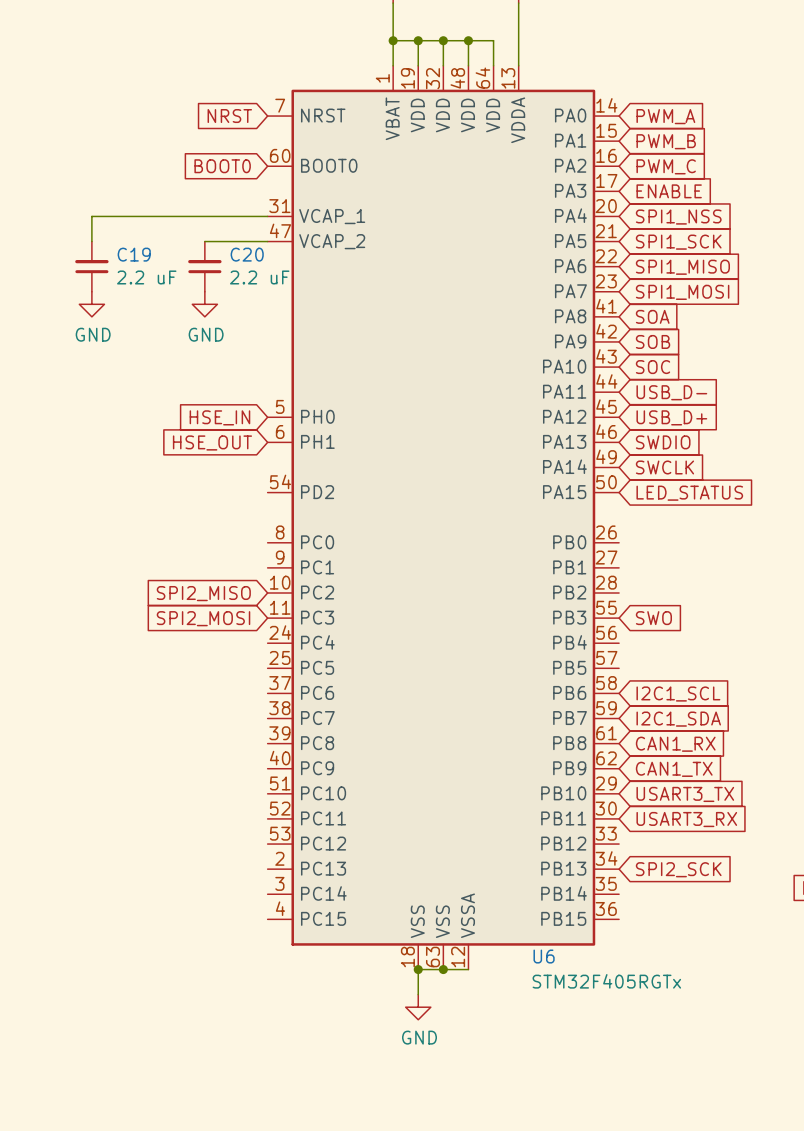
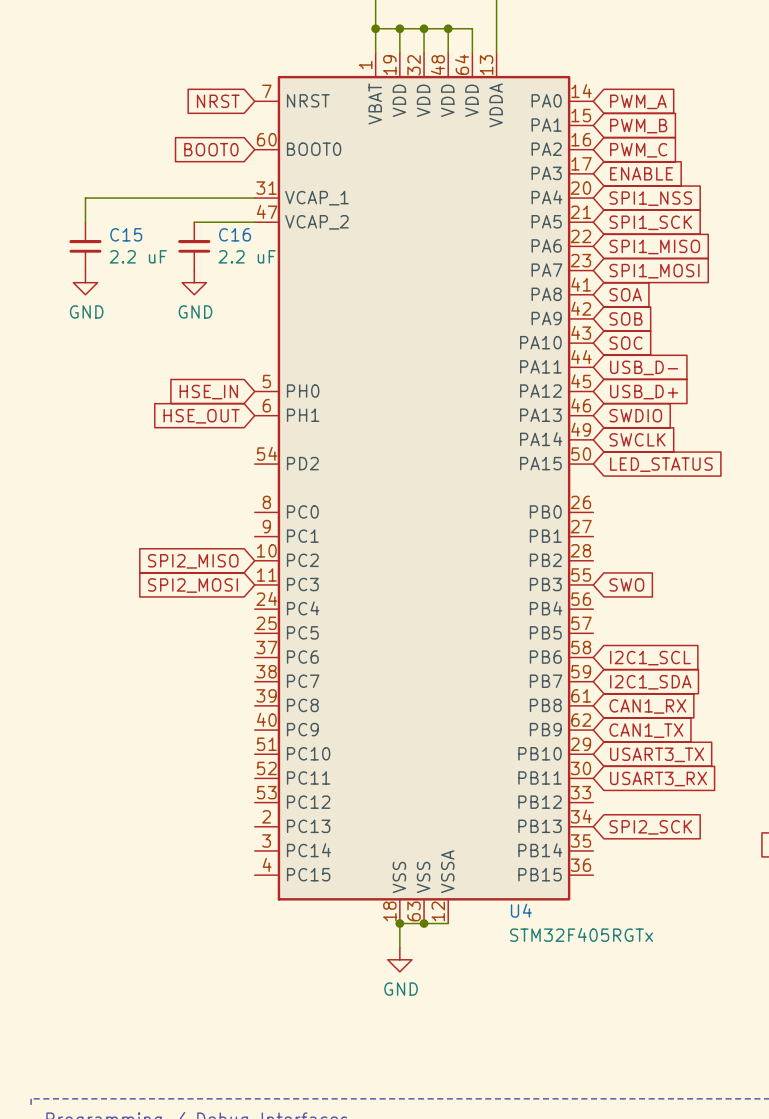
C19 name: C19 (134, 254) -> C15 (126, 234)
C20 name: C20 (247, 254) -> C16 (235, 234)
U6 name: U6 (544, 956) -> U4 (521, 910)

